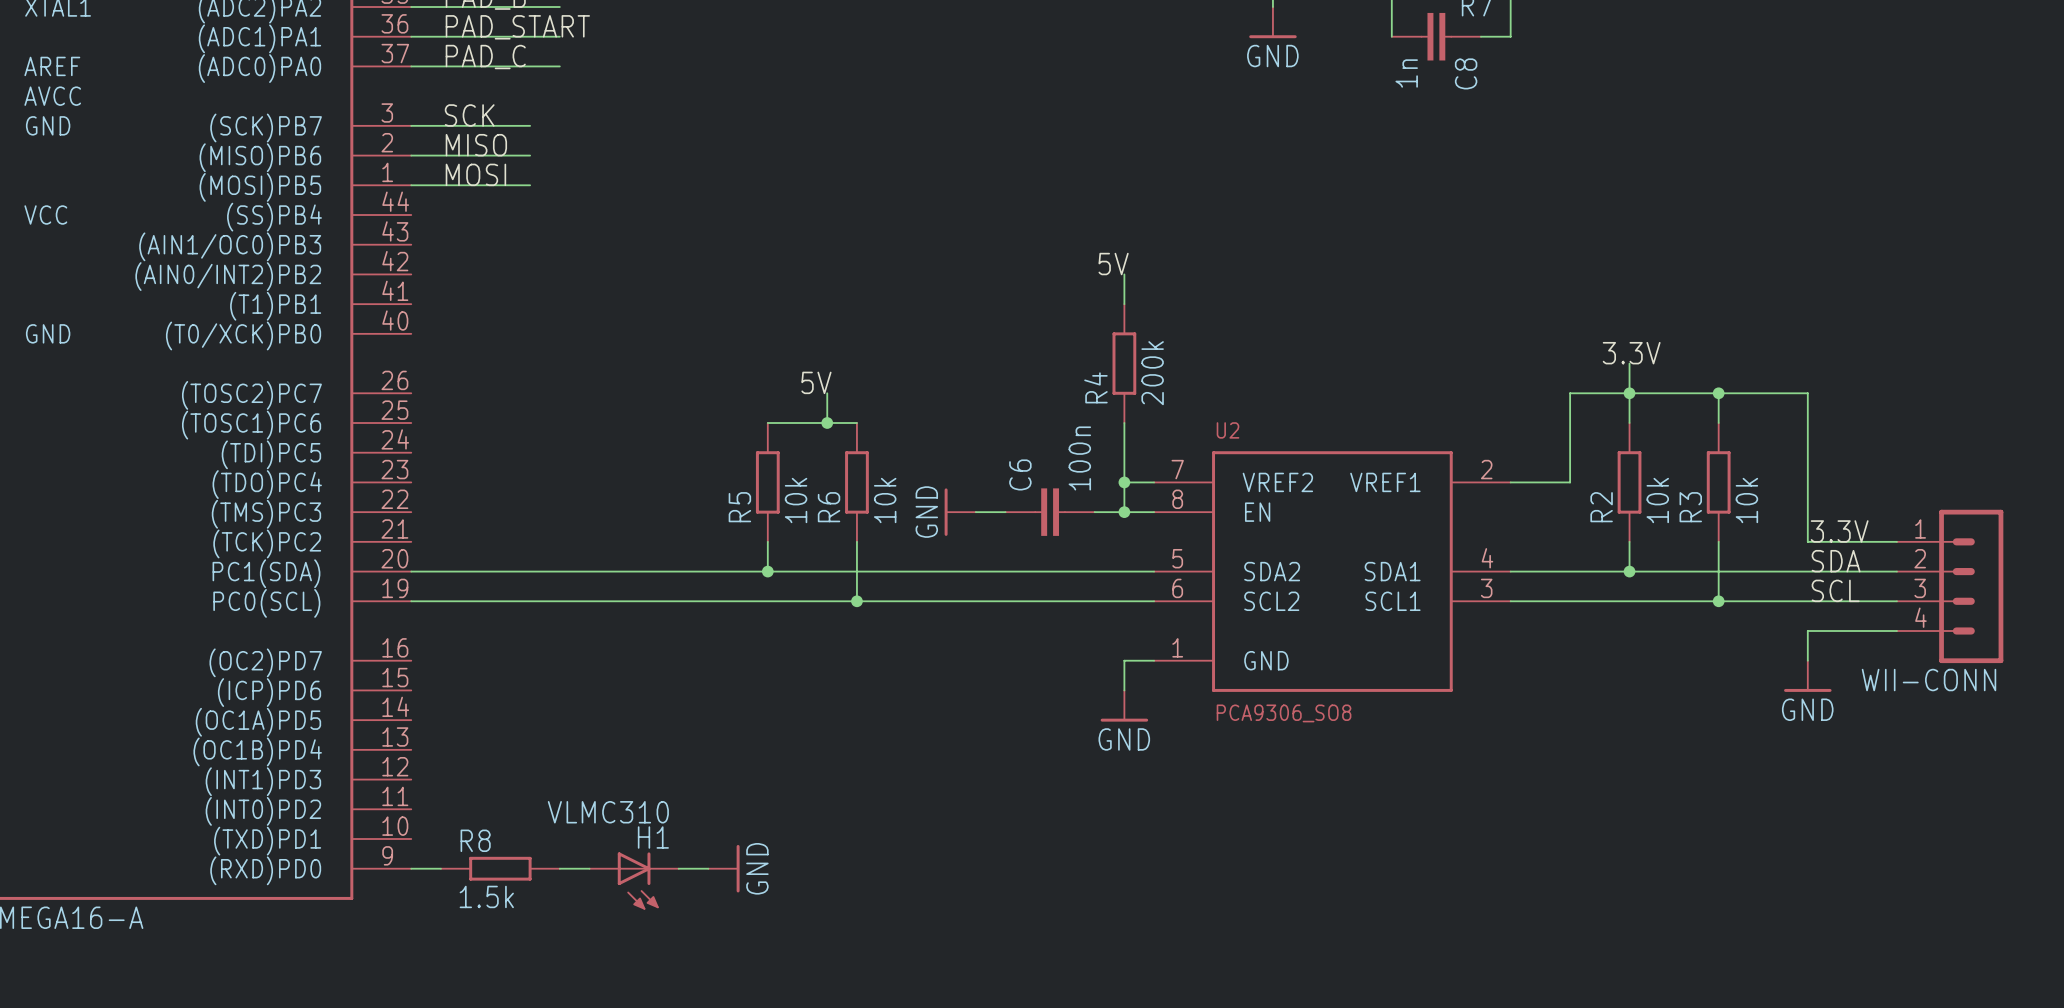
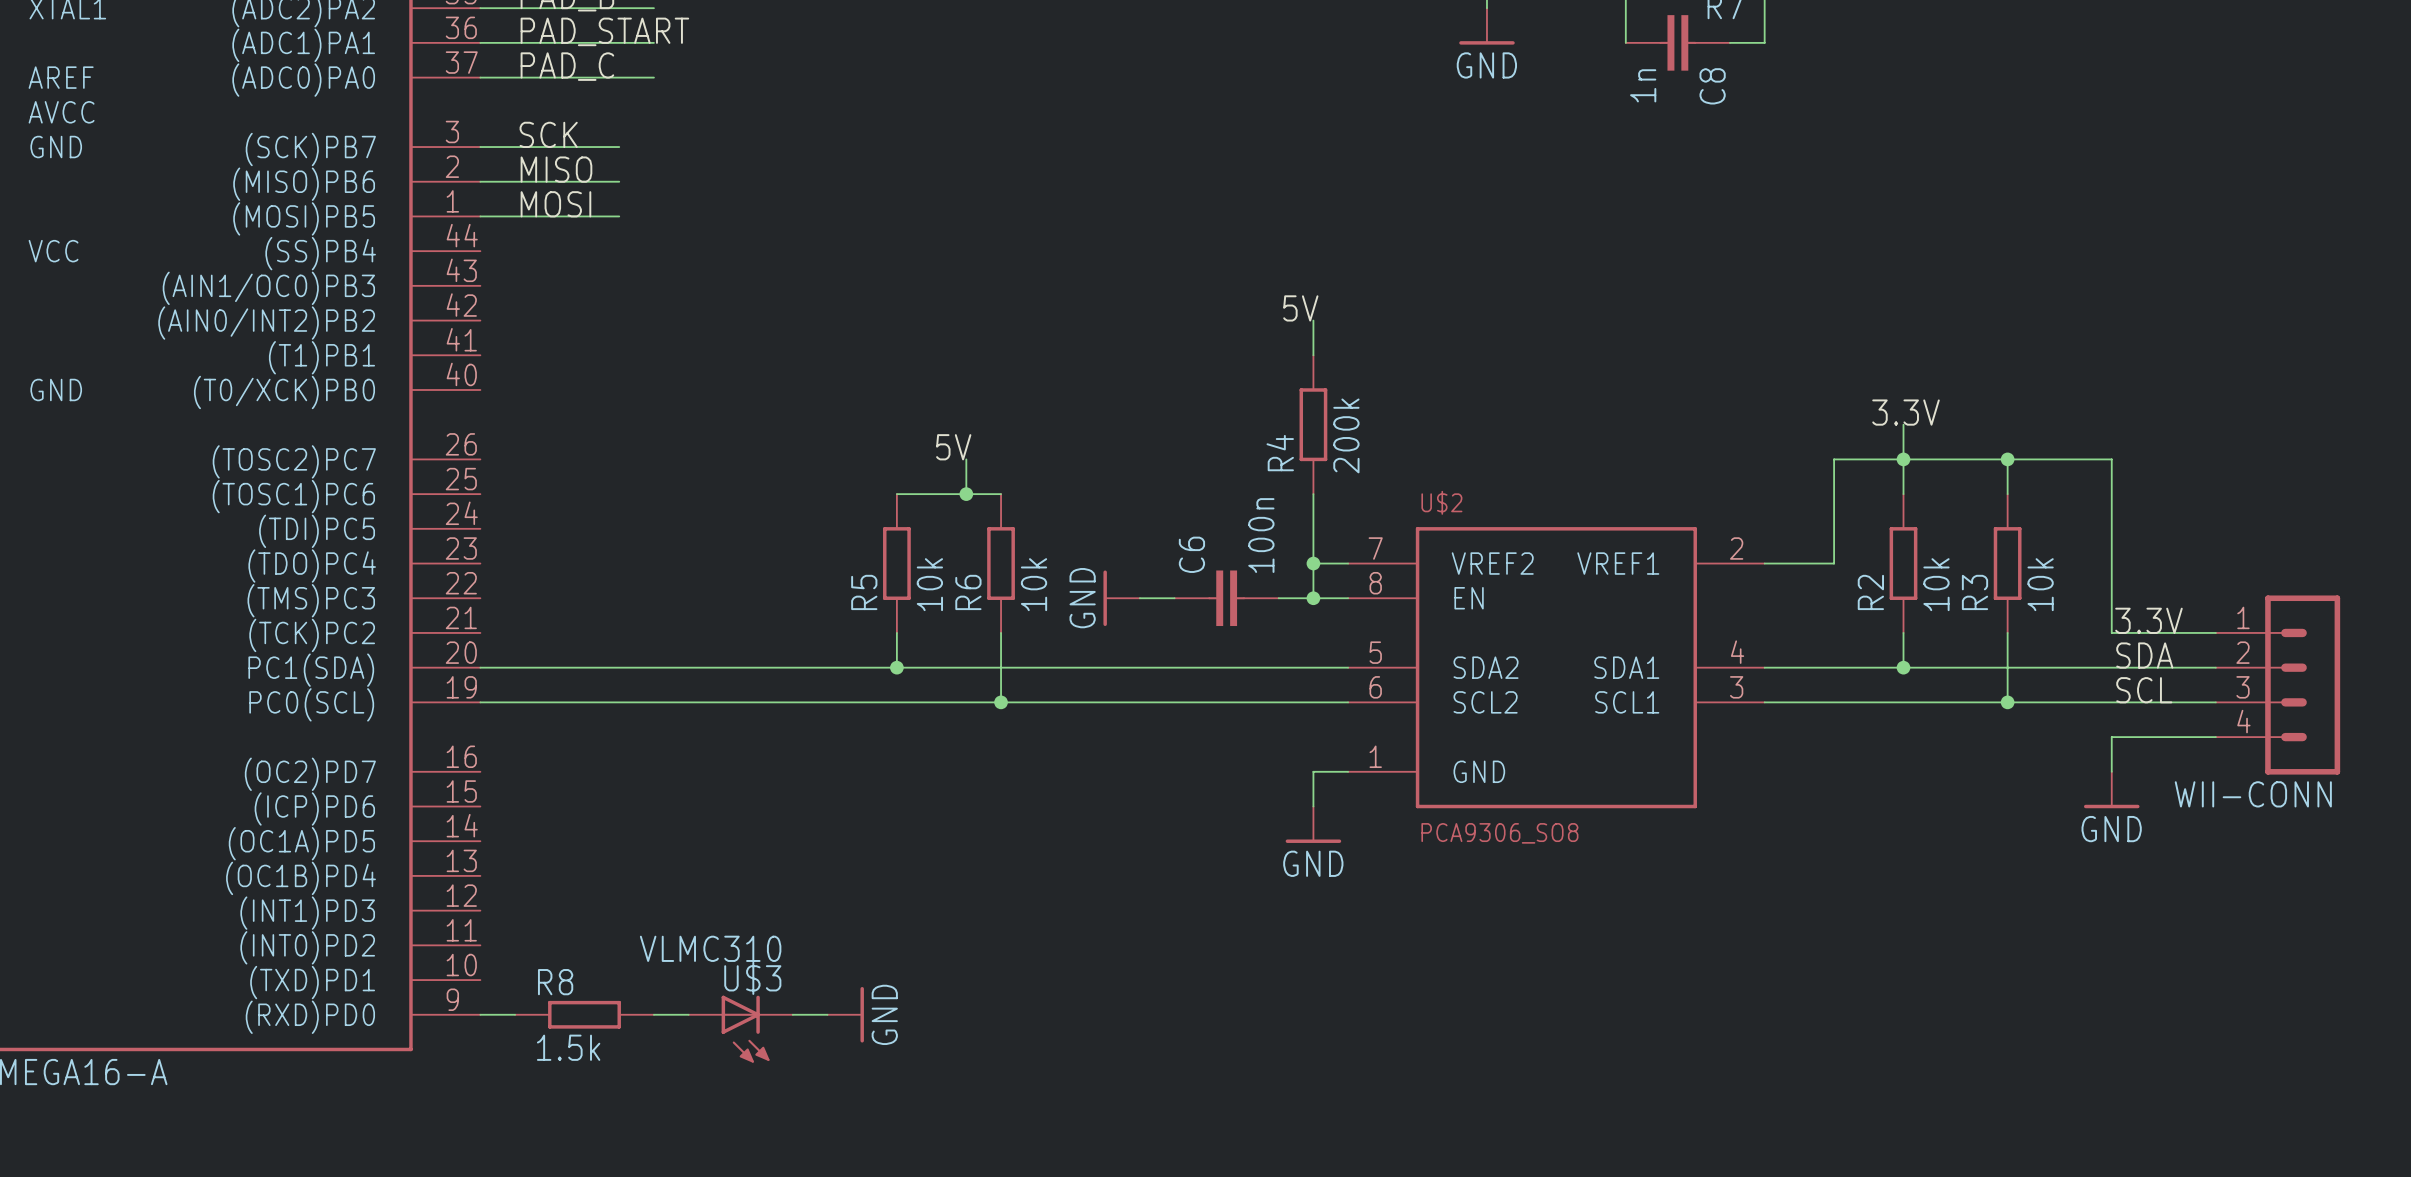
U2 name: U2 (1228, 430) -> U$2 (1441, 502)
H1 name: H1 (653, 837) -> U$3 (752, 978)

